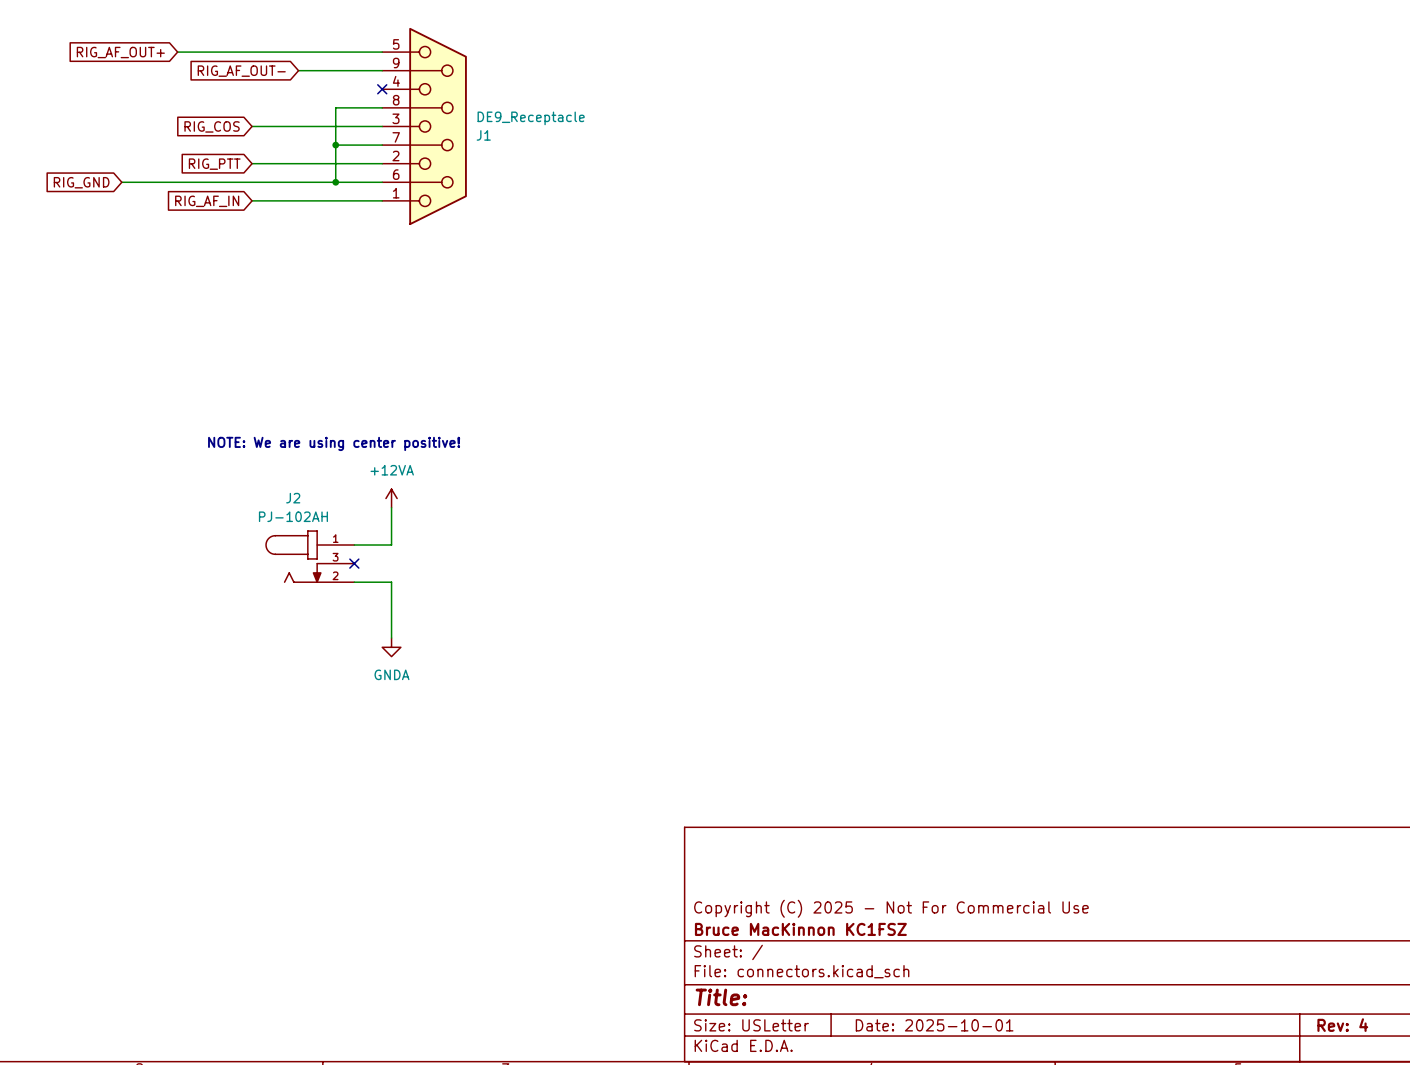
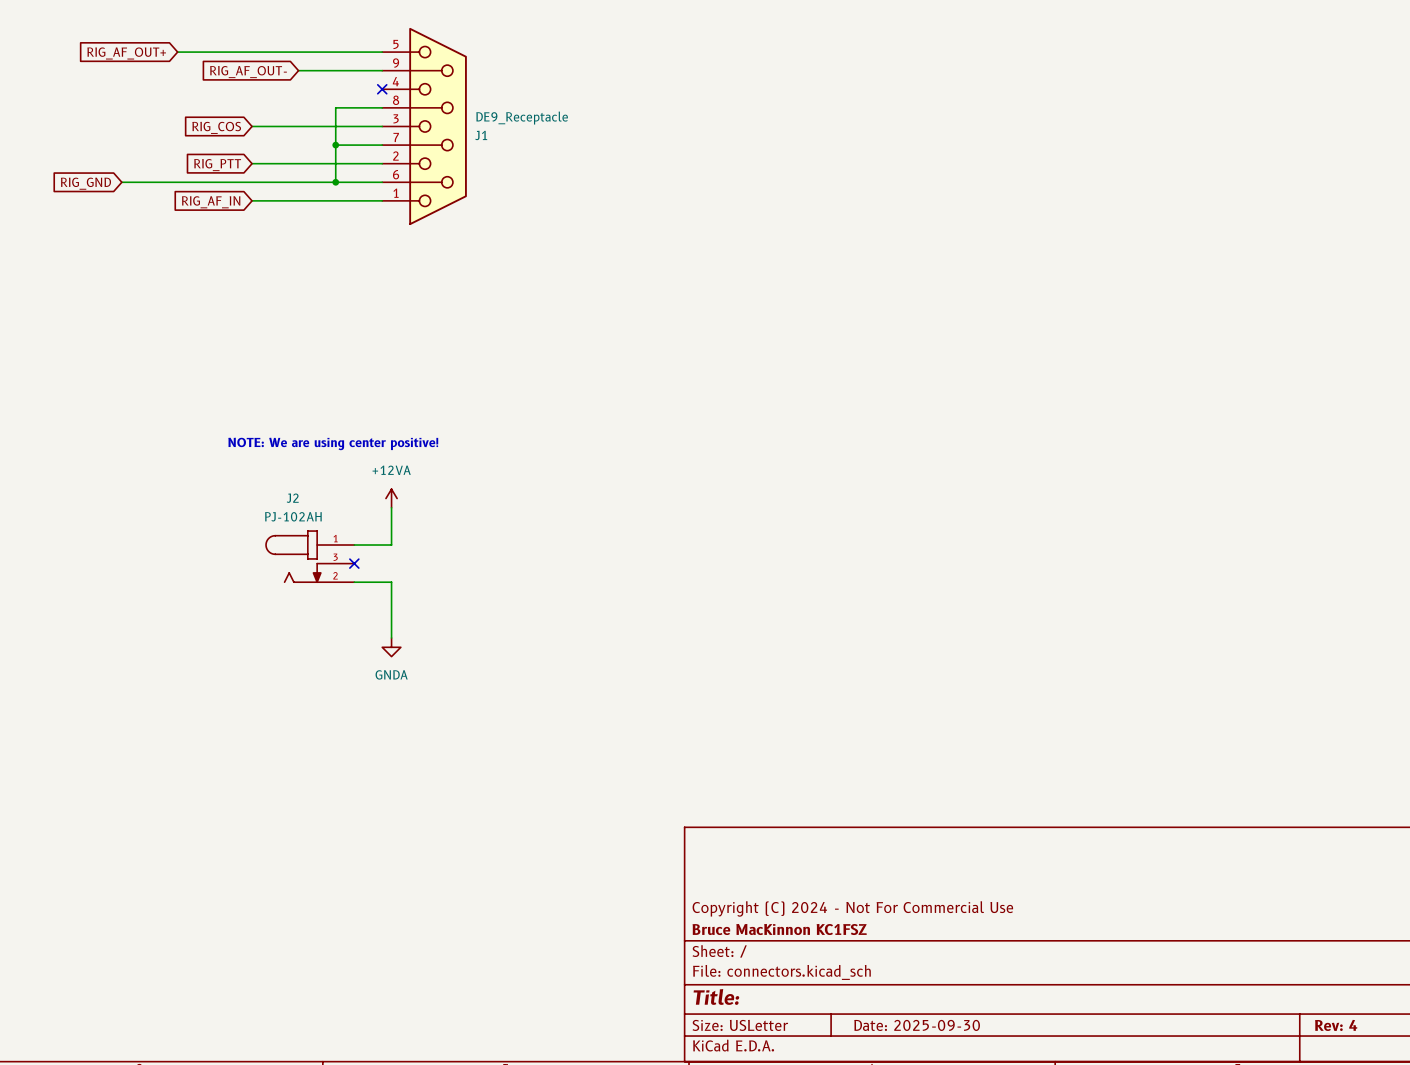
title block: Copyright (C) 2025 - Not For Commercial Use (891, 908) -> Copyright (C) 2024 - Not For Commercial Use (852, 908)
title block: Date: 2025-10-01 (934, 1025) -> Date: 2025-09-30 (917, 1025)

